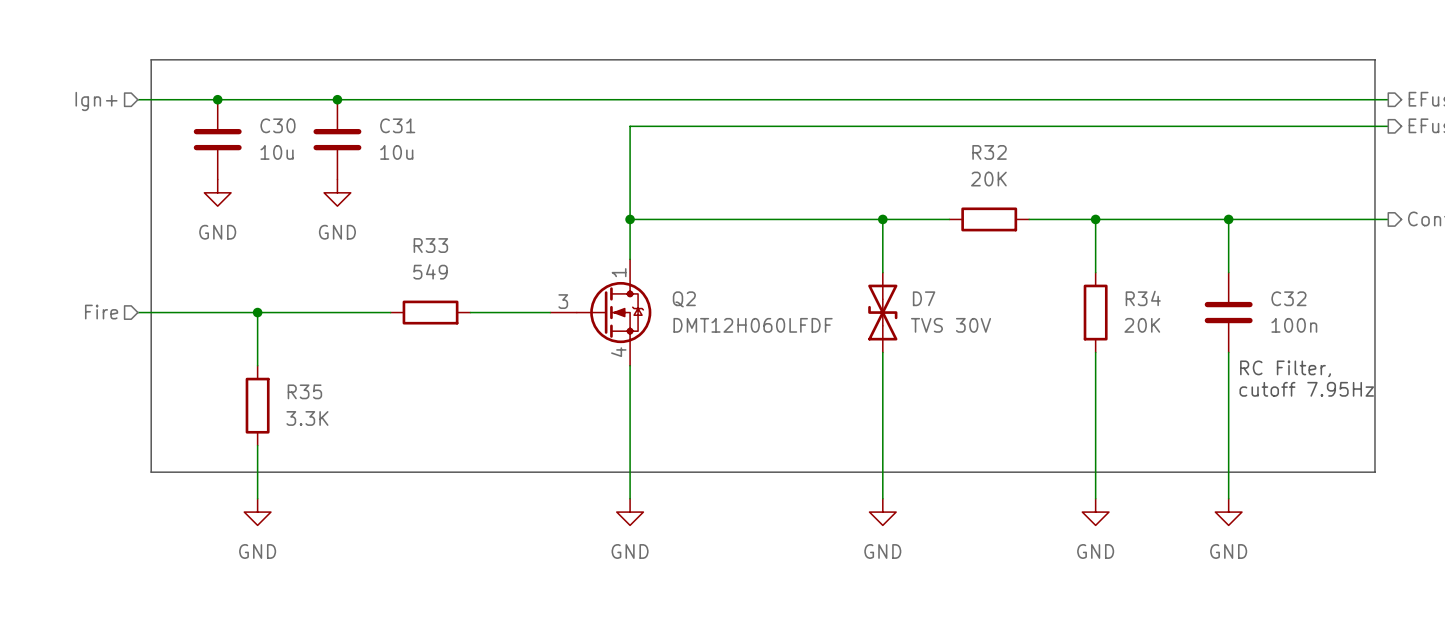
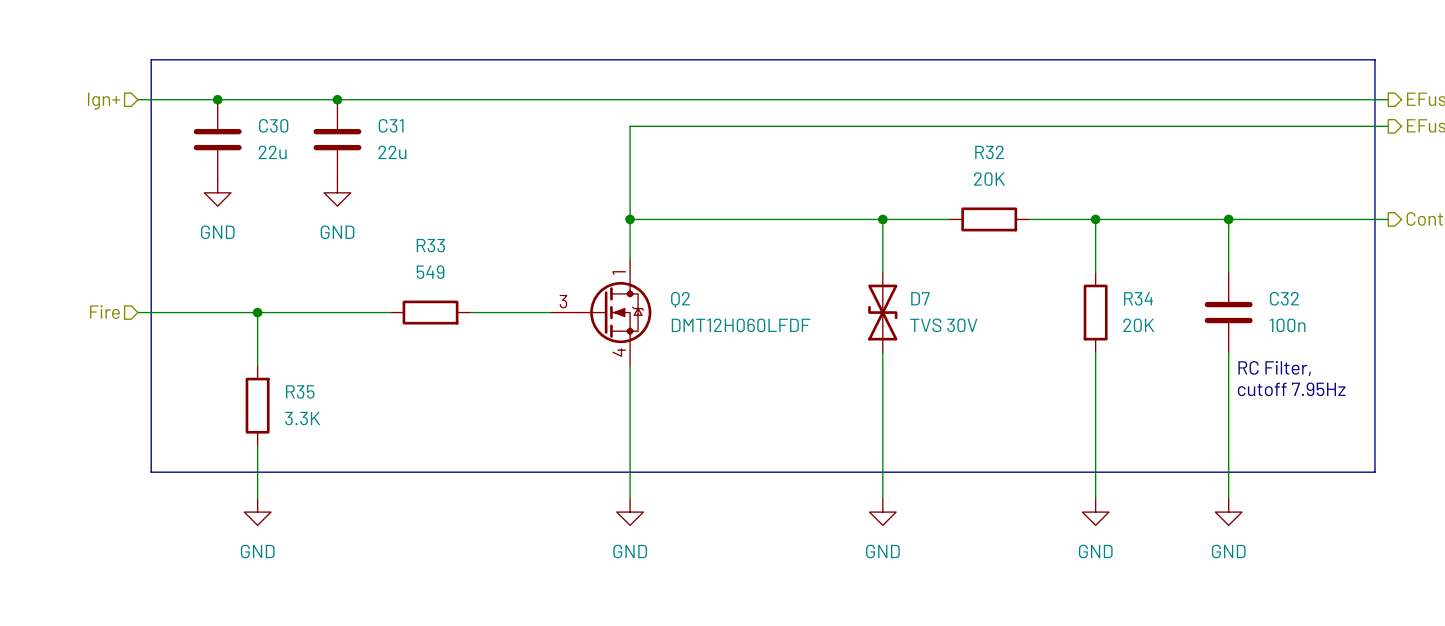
C30 value: 10u (277, 152) -> 22u (272, 152)
C31 value: 10u (396, 152) -> 22u (392, 152)

